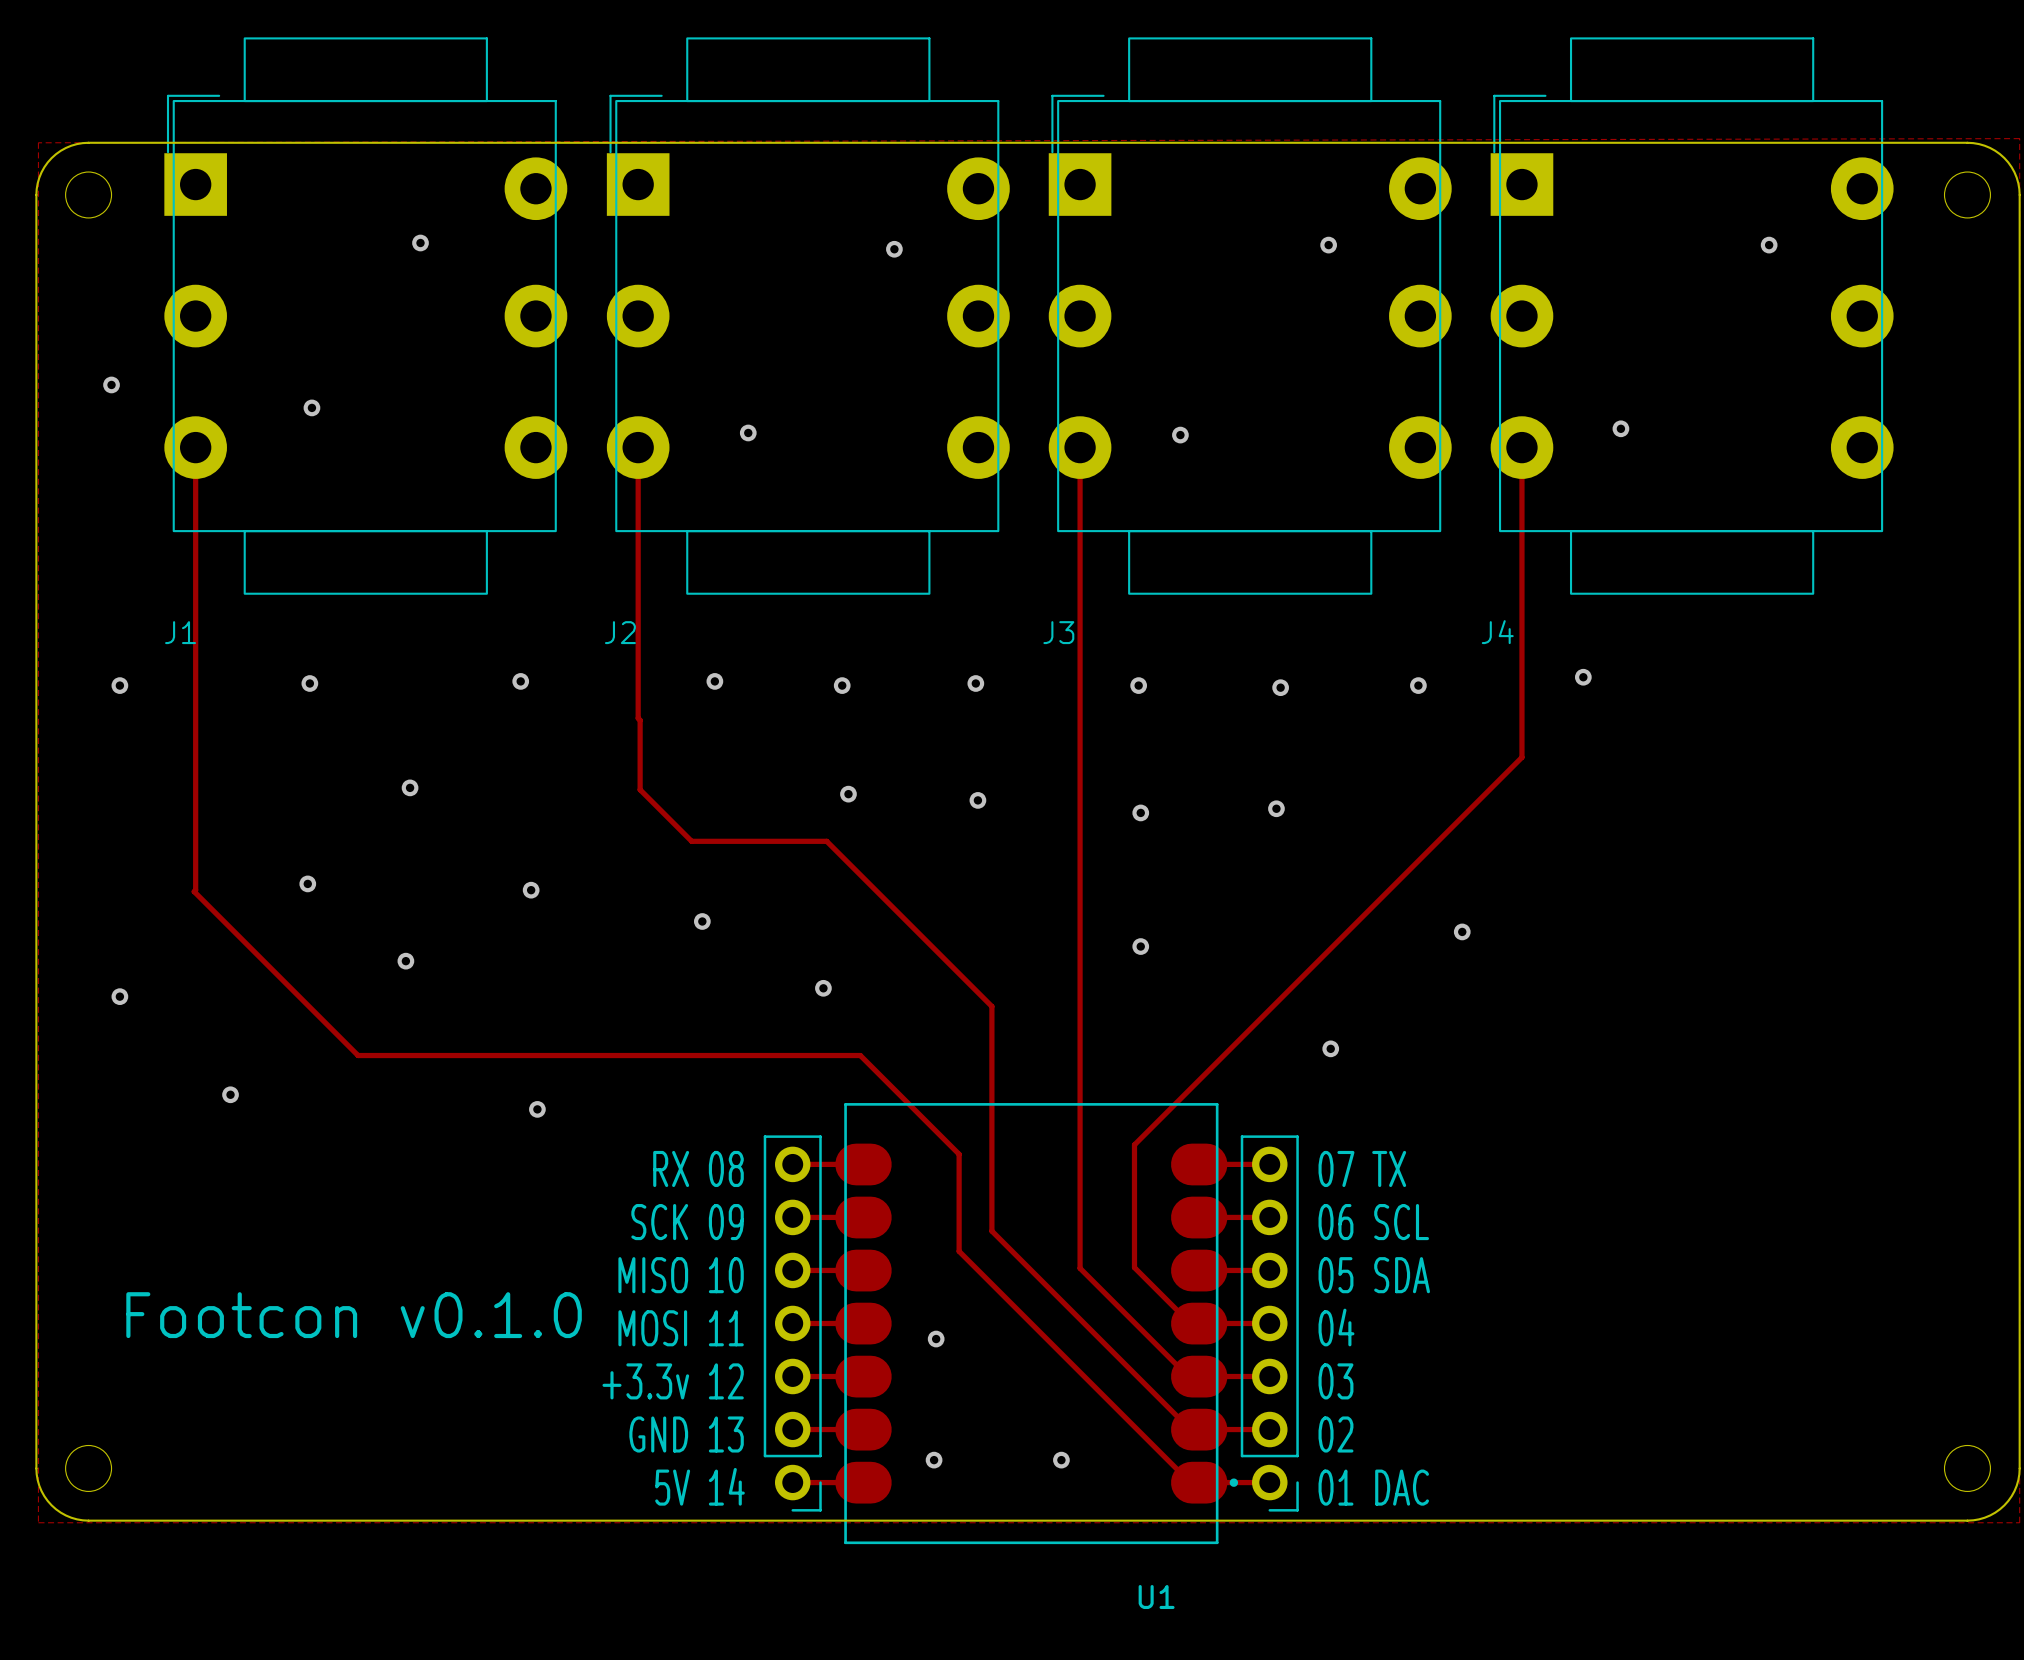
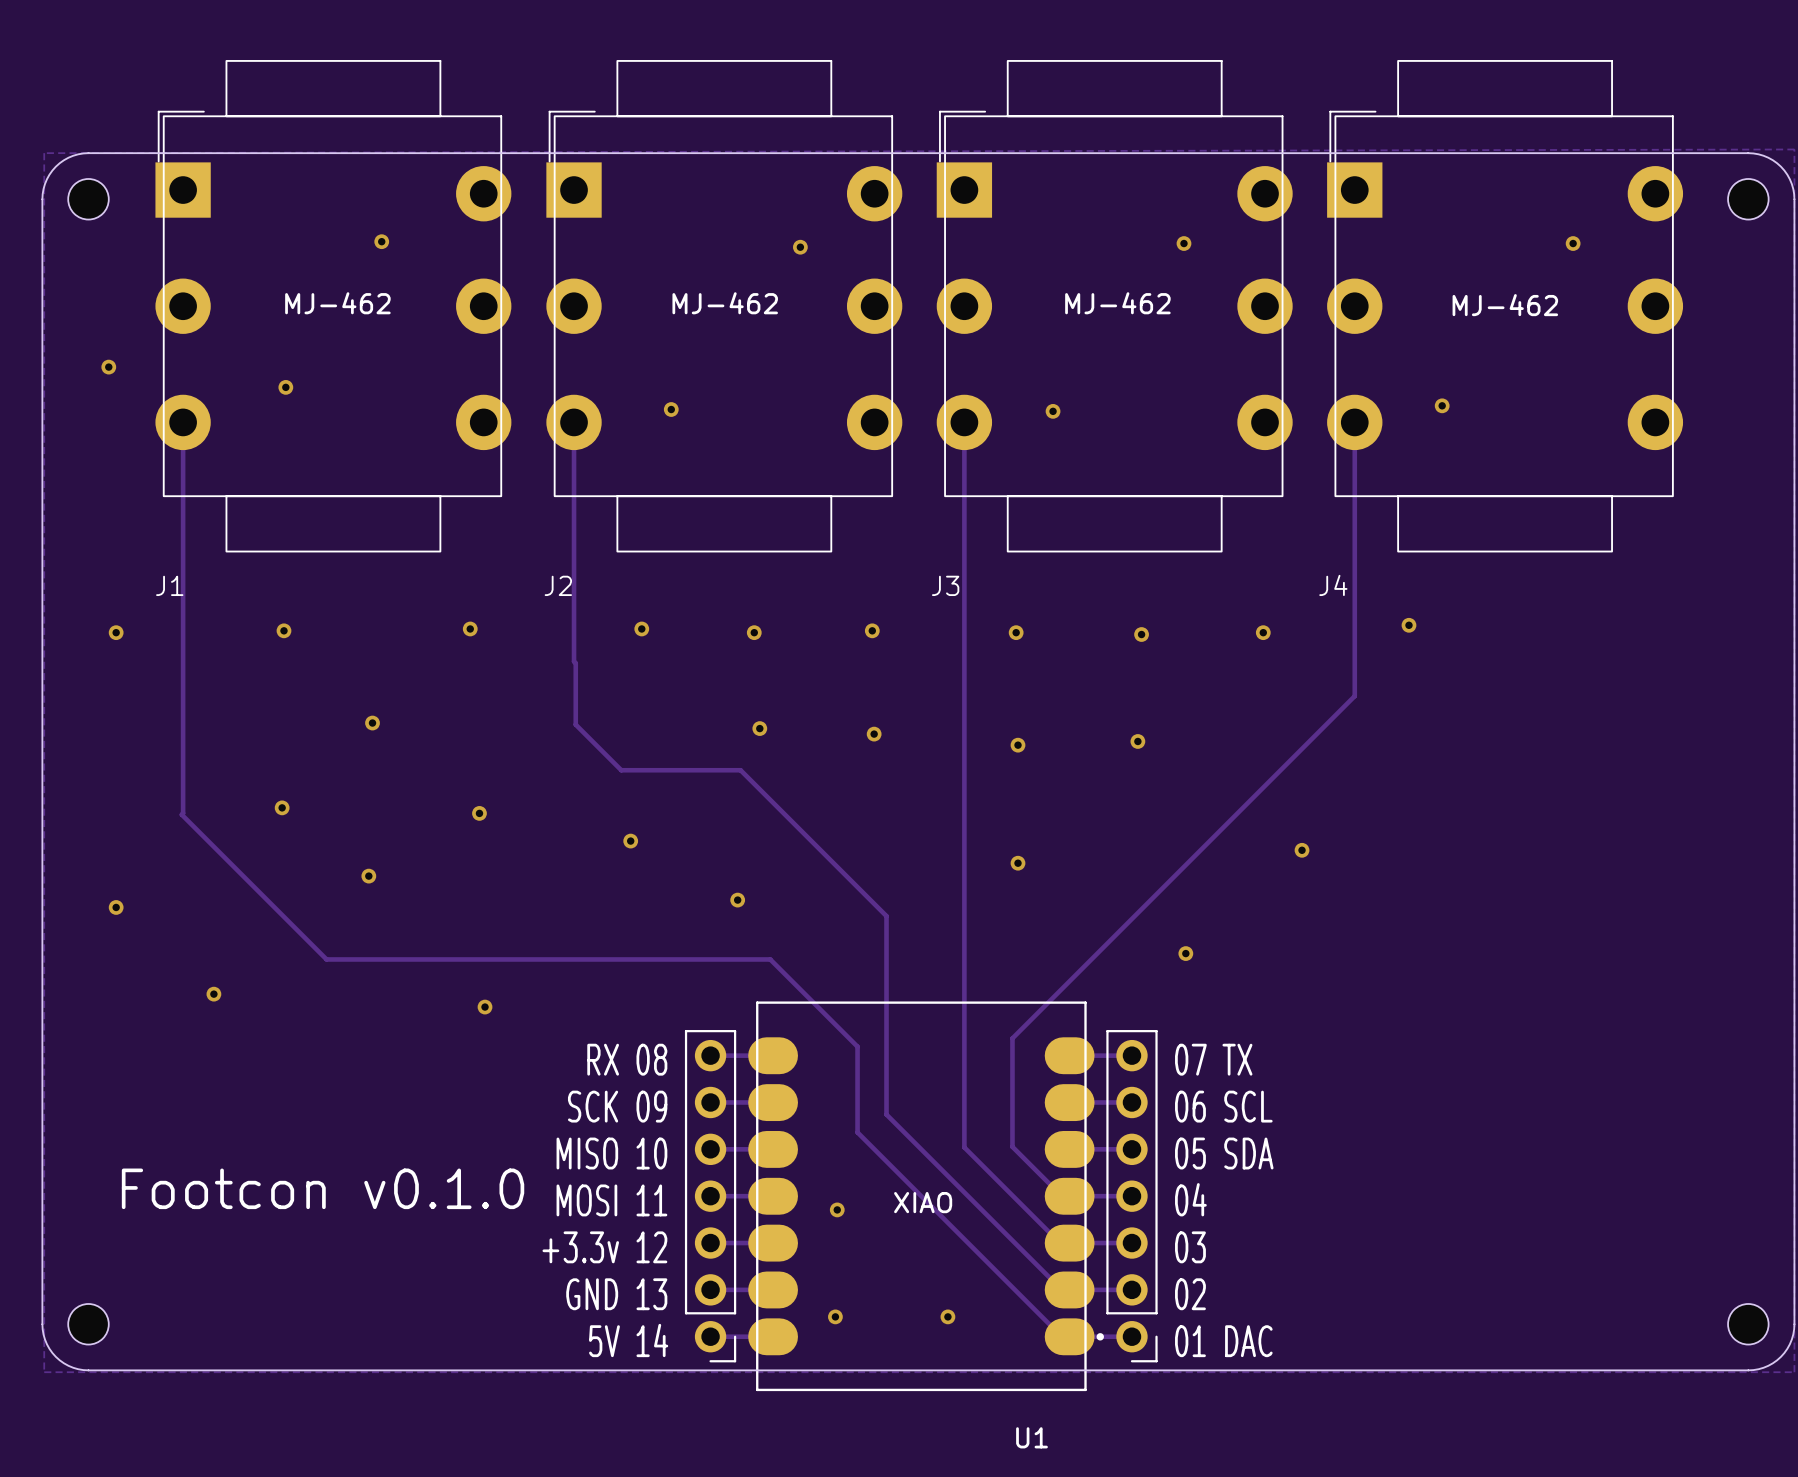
J1 value: none -> MJ-462 (337, 303)
J2 value: none -> MJ-462 (725, 303)
J3 value: none -> MJ-462 (1117, 303)
J4 value: none -> MJ-462 (1505, 305)
U1 value: none -> XIAO (923, 1202)

